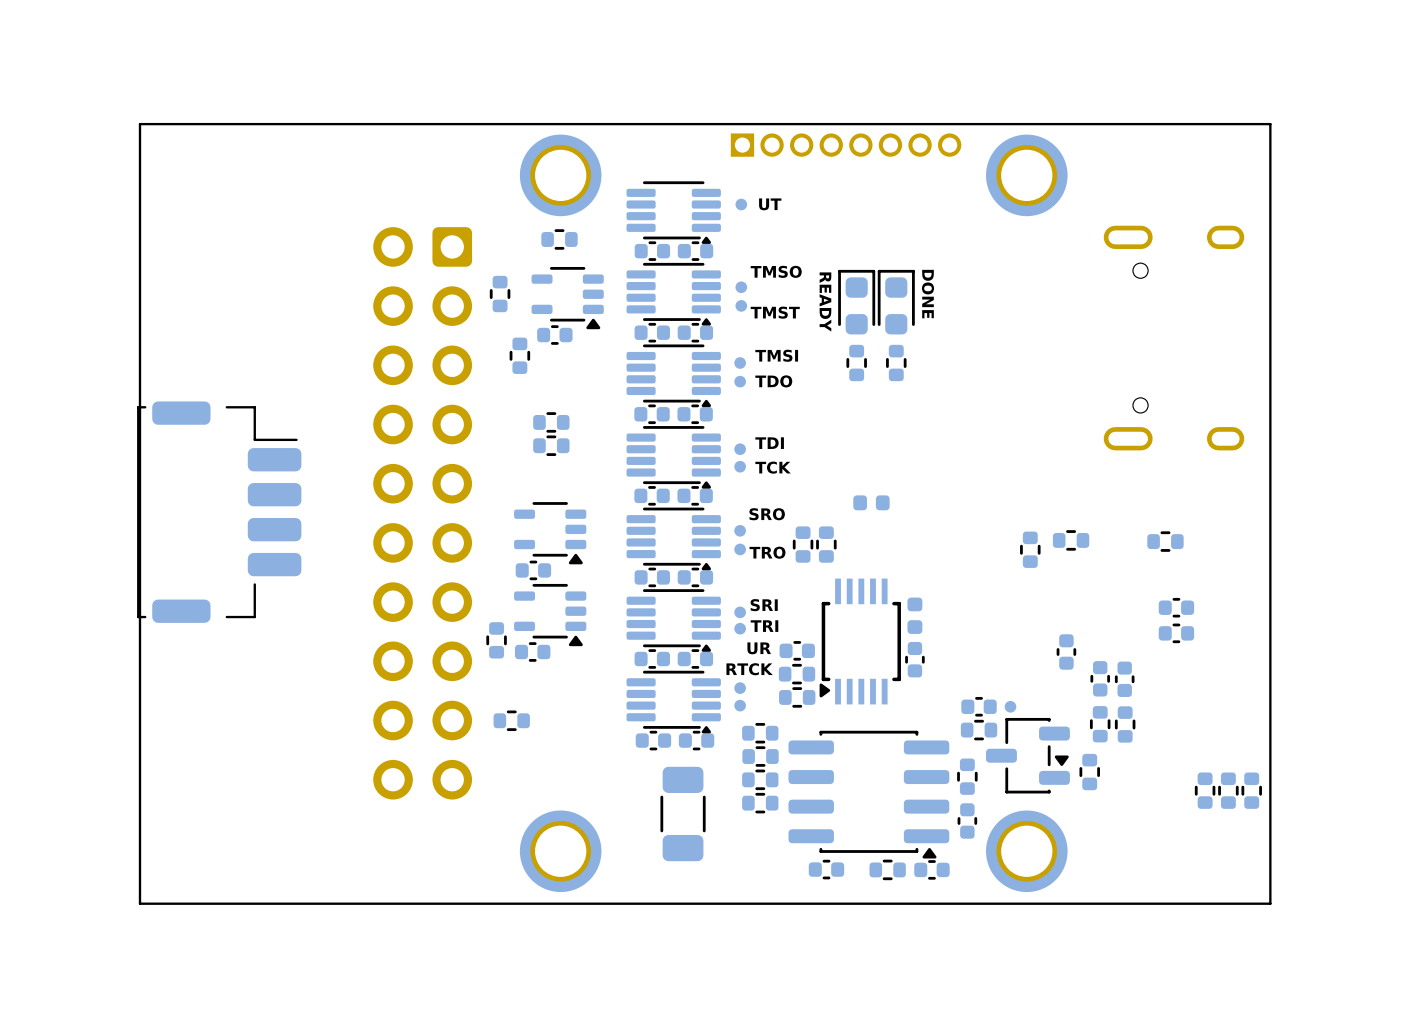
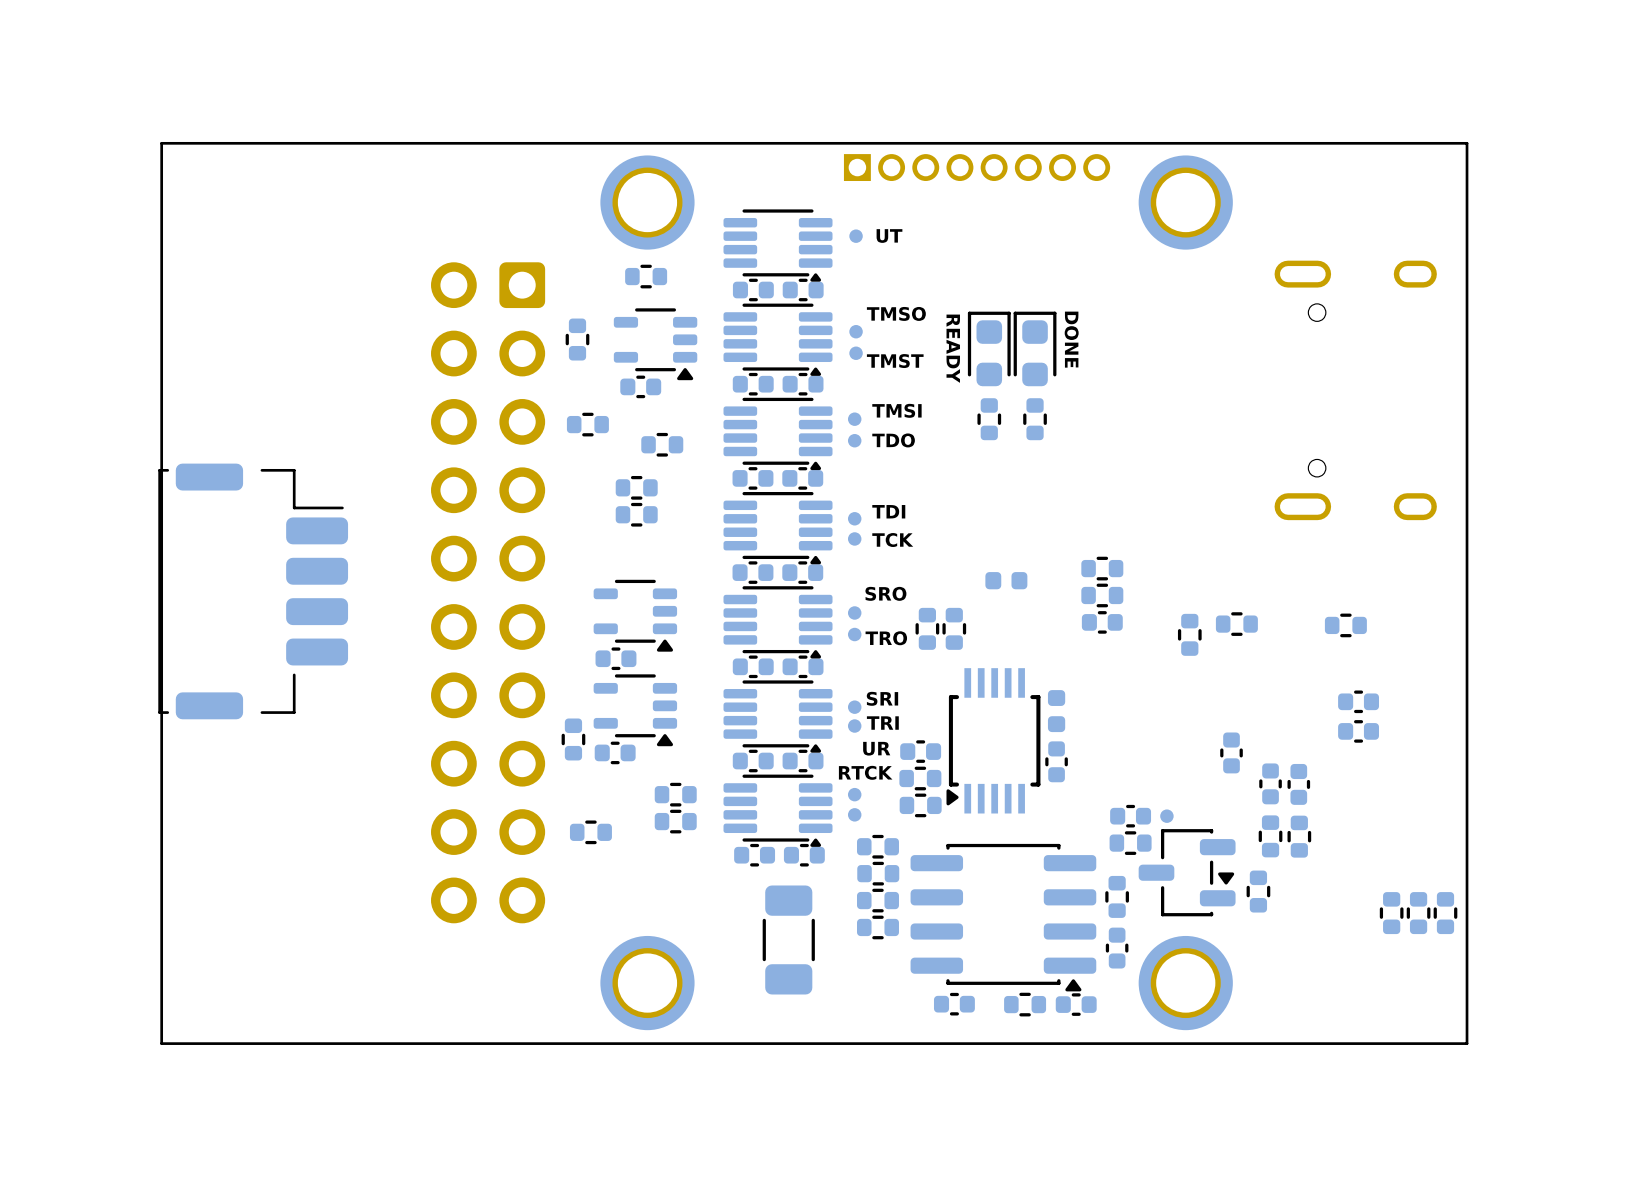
part rotation: 0° (519, 355) -> 90° clockwise (587, 424)
part: none -> (662, 444)
part: none -> (1102, 568)
part: none -> (1102, 595)
part: none -> (1102, 622)
part: none -> (675, 794)
part: none -> (675, 821)

